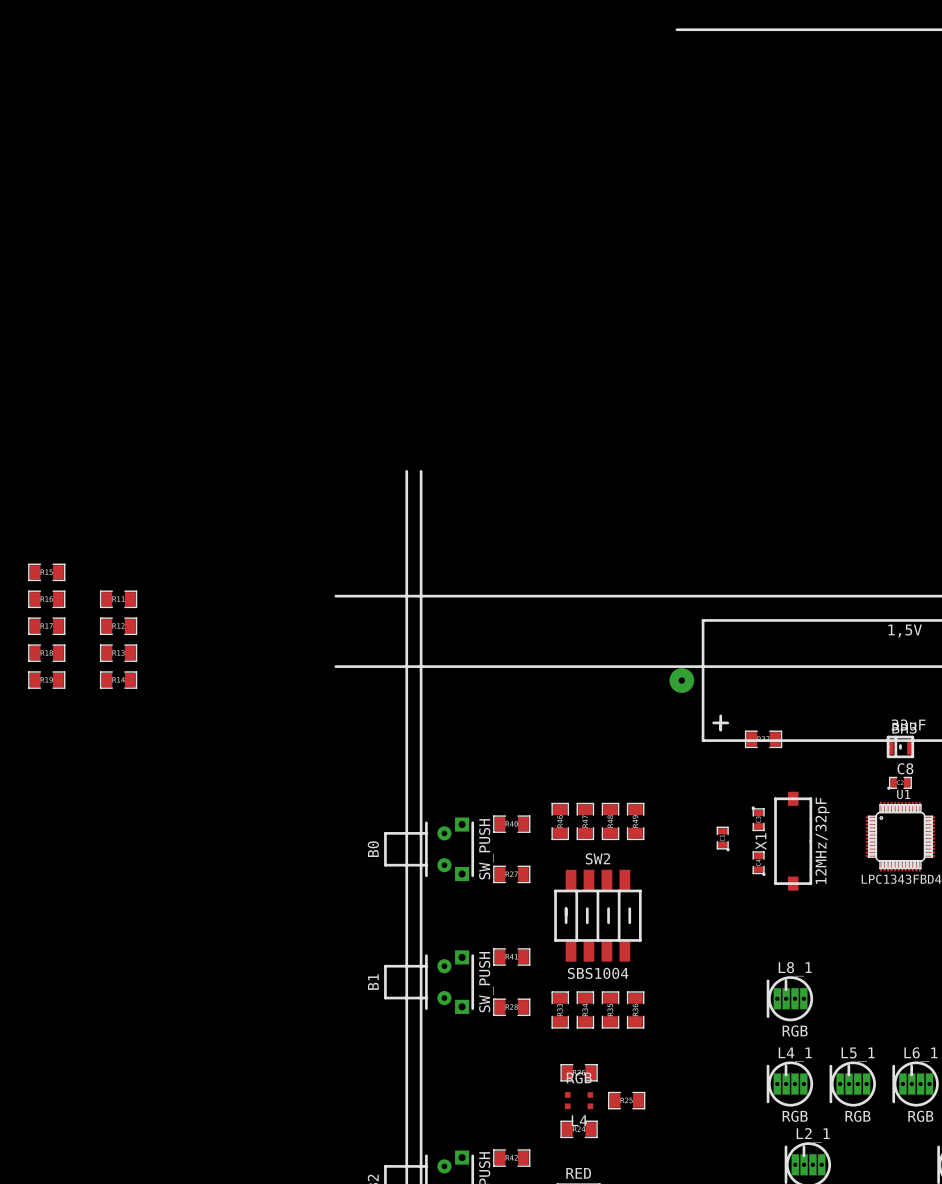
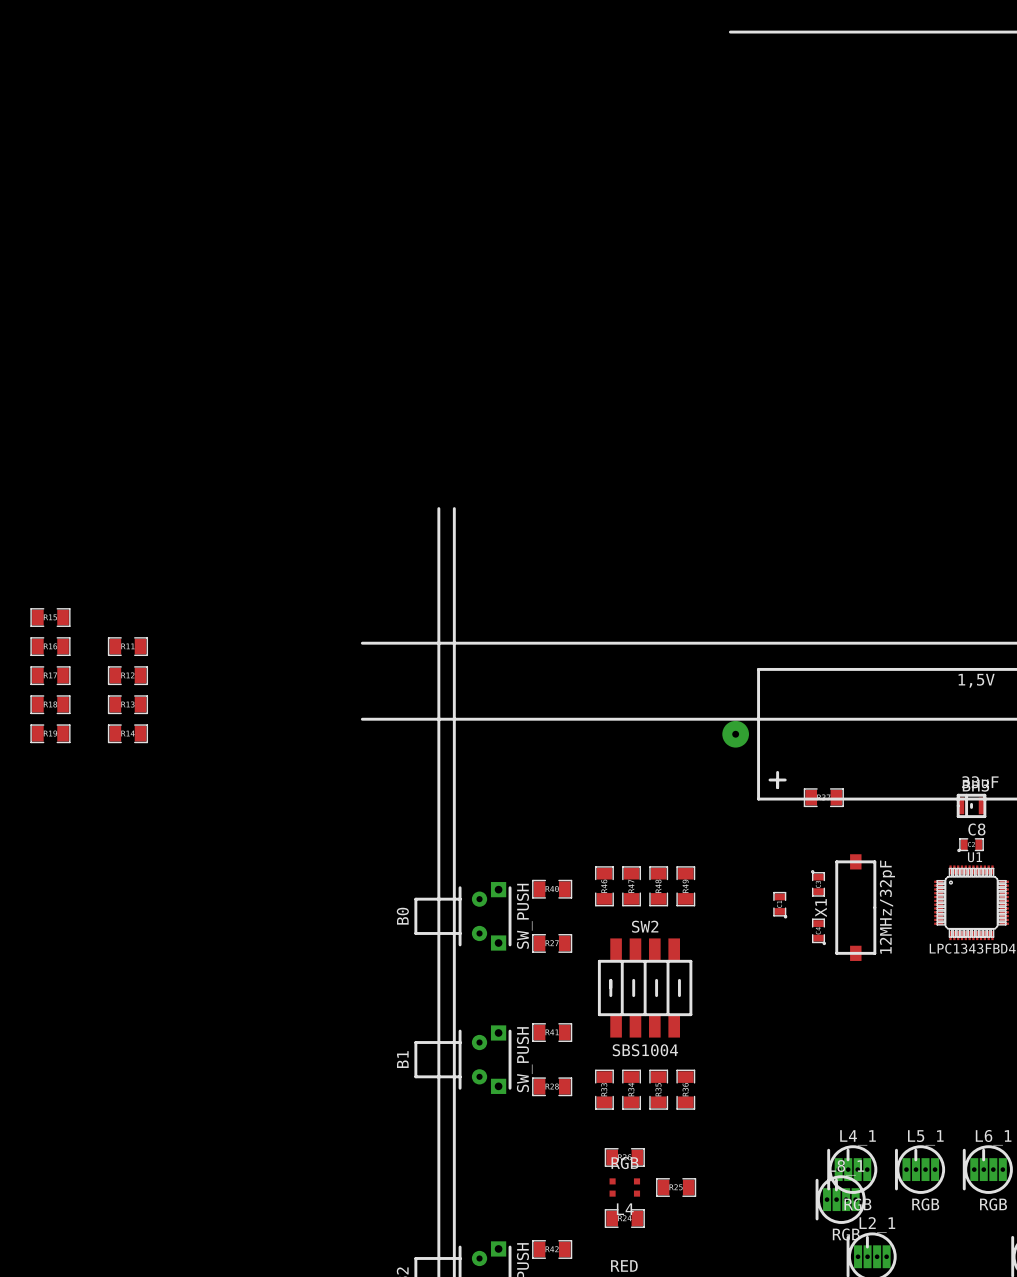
L8_1 position: (789, 998) -> (840, 1199)

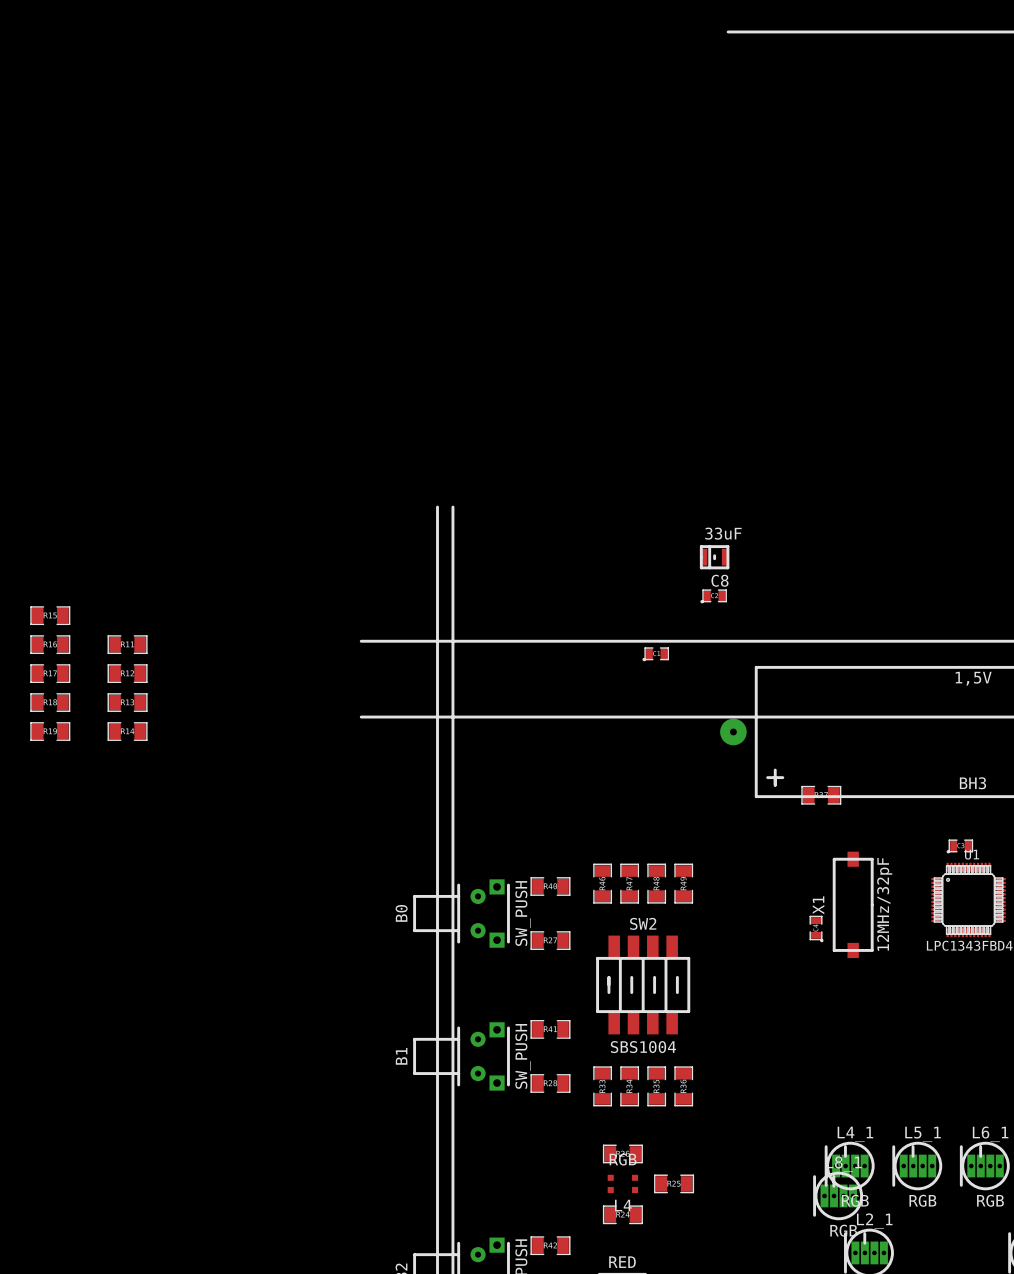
C8 position: (971, 805) -> (714, 557)
part position: (970, 845) -> (713, 596)
part rotation: 0° (818, 883) -> 90° counterclockwise (959, 846)
part position: (818, 883) -> (959, 846)
part rotation: 0° (780, 905) -> 90° clockwise (655, 654)
part position: (780, 905) -> (655, 654)

